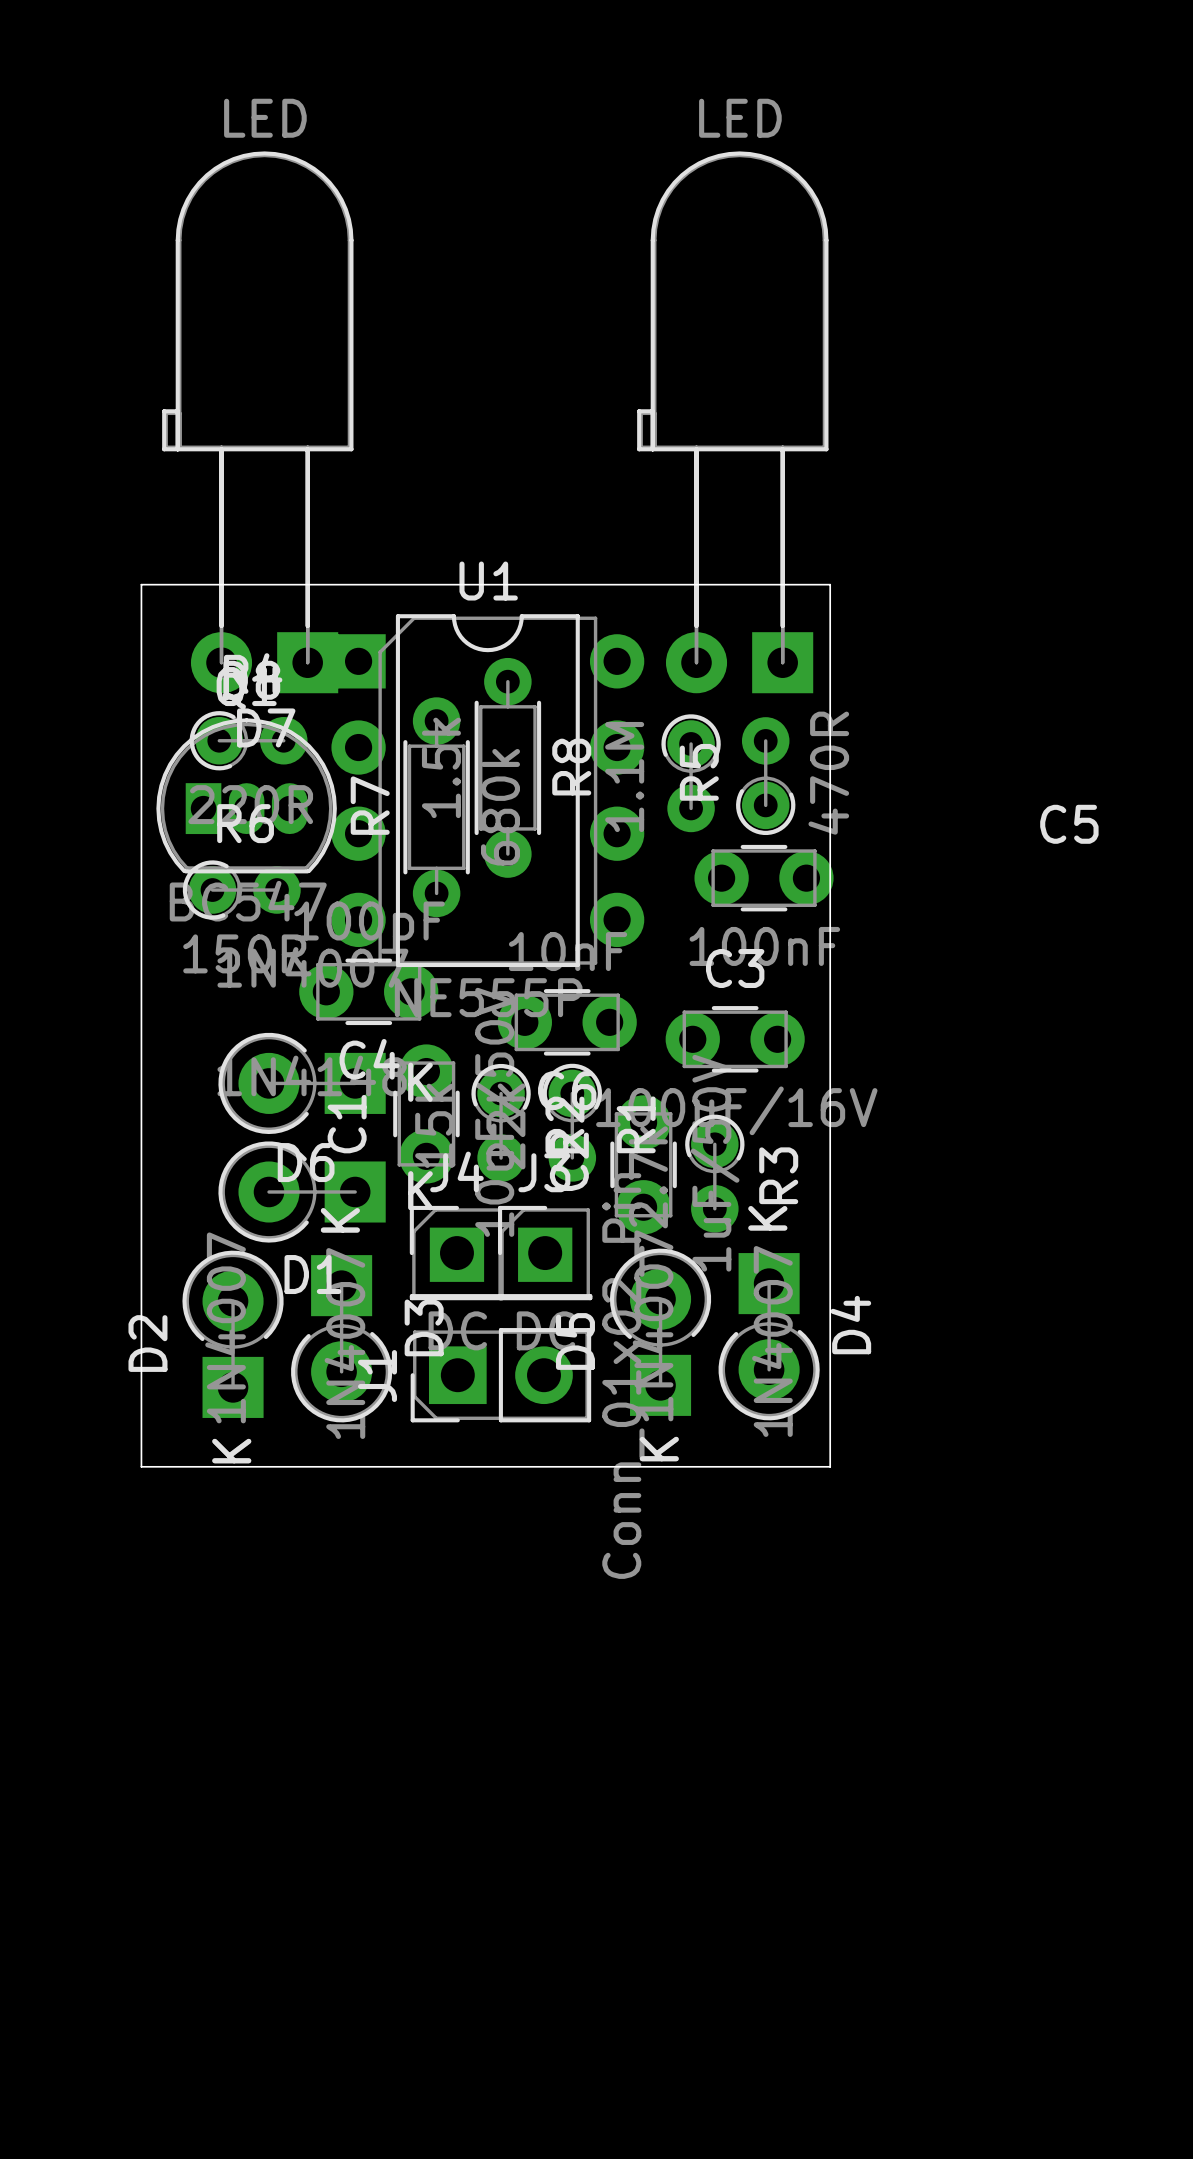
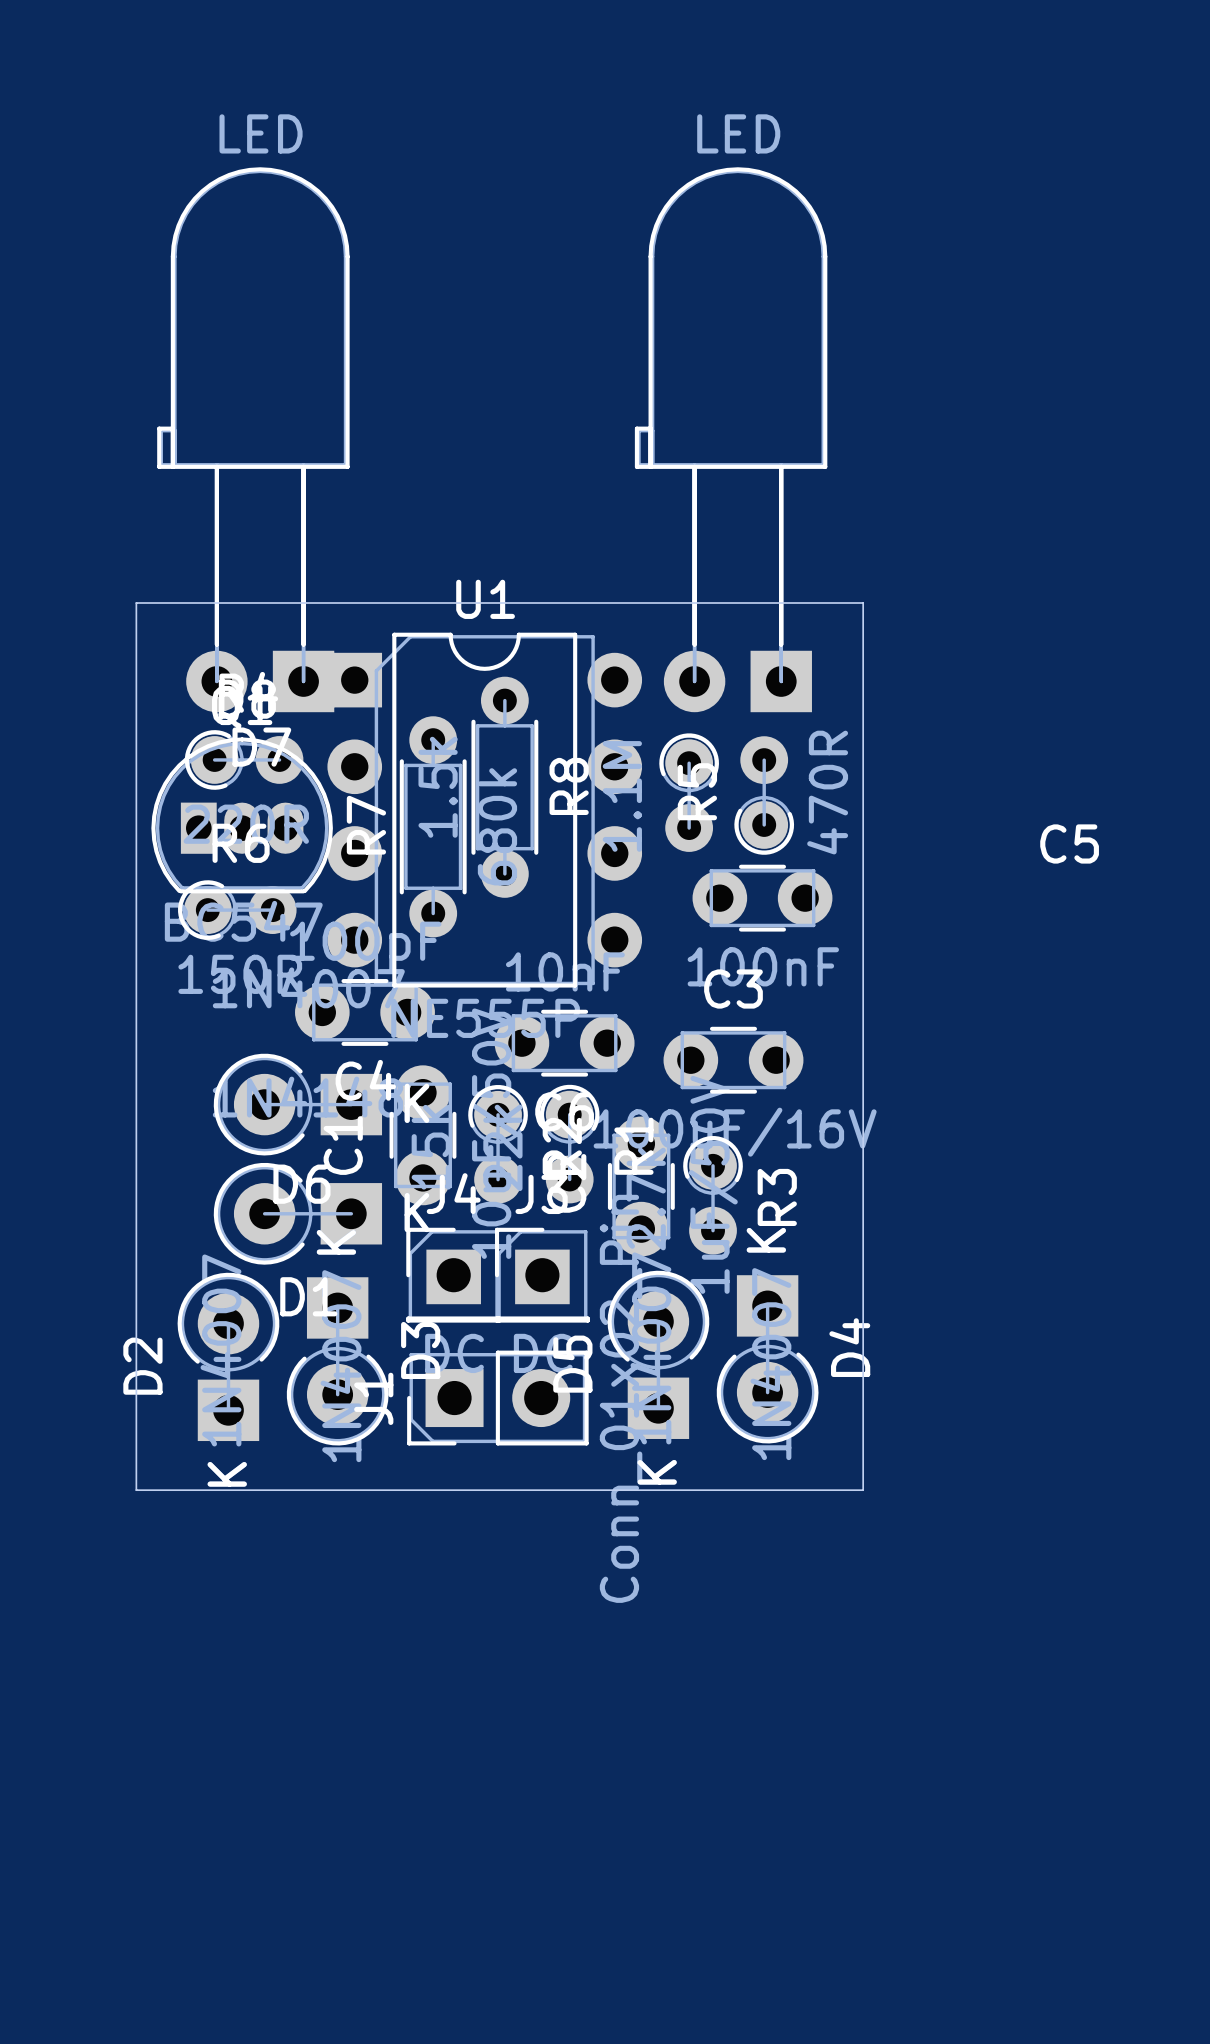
board edge: (830, 584) (830, 1466) -> (829, 603) (863, 603) (863, 1490) (829, 1490)

